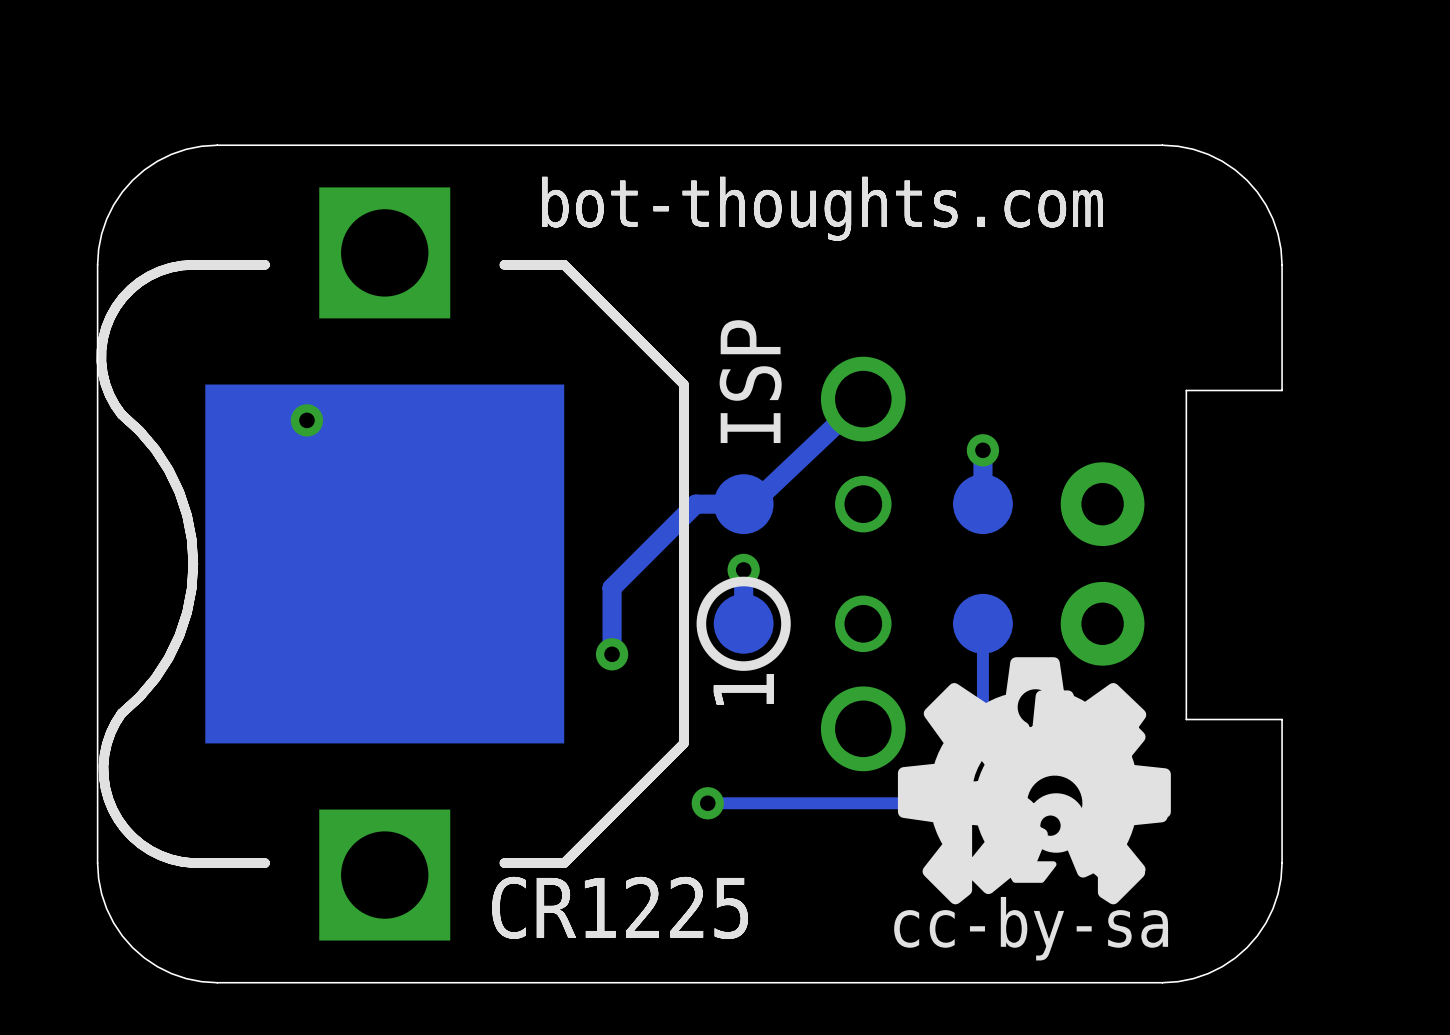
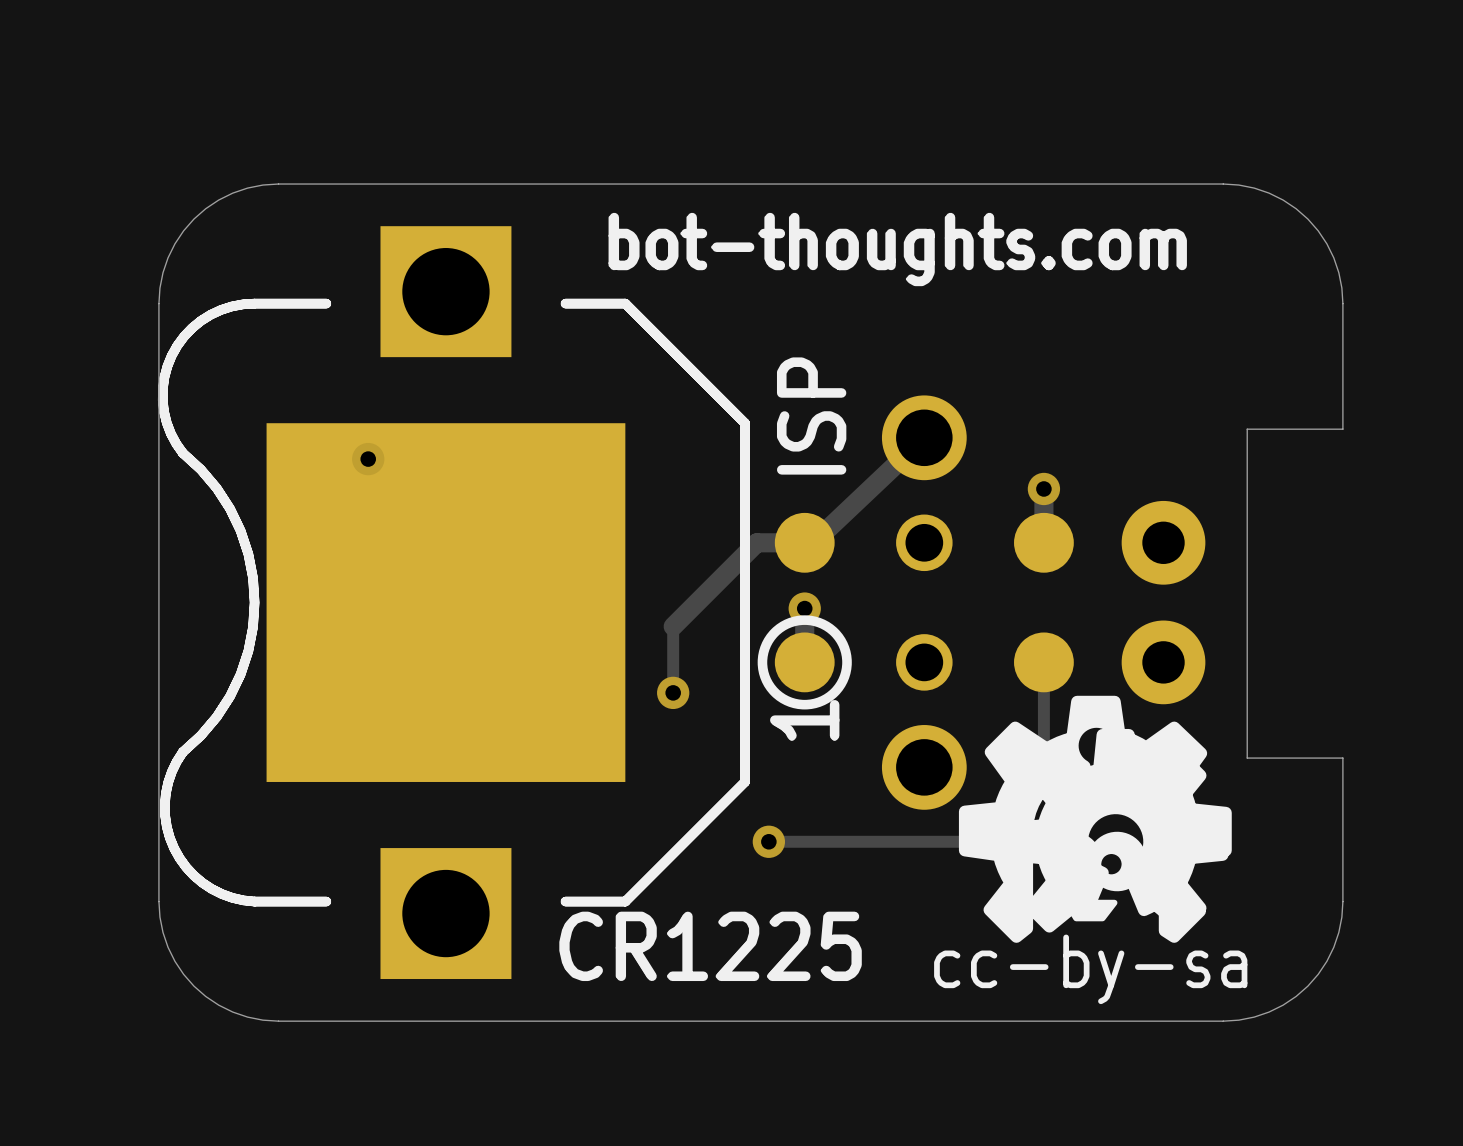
track width: thick (612, 587) (612, 654) -> thin (673, 626) (673, 692)

